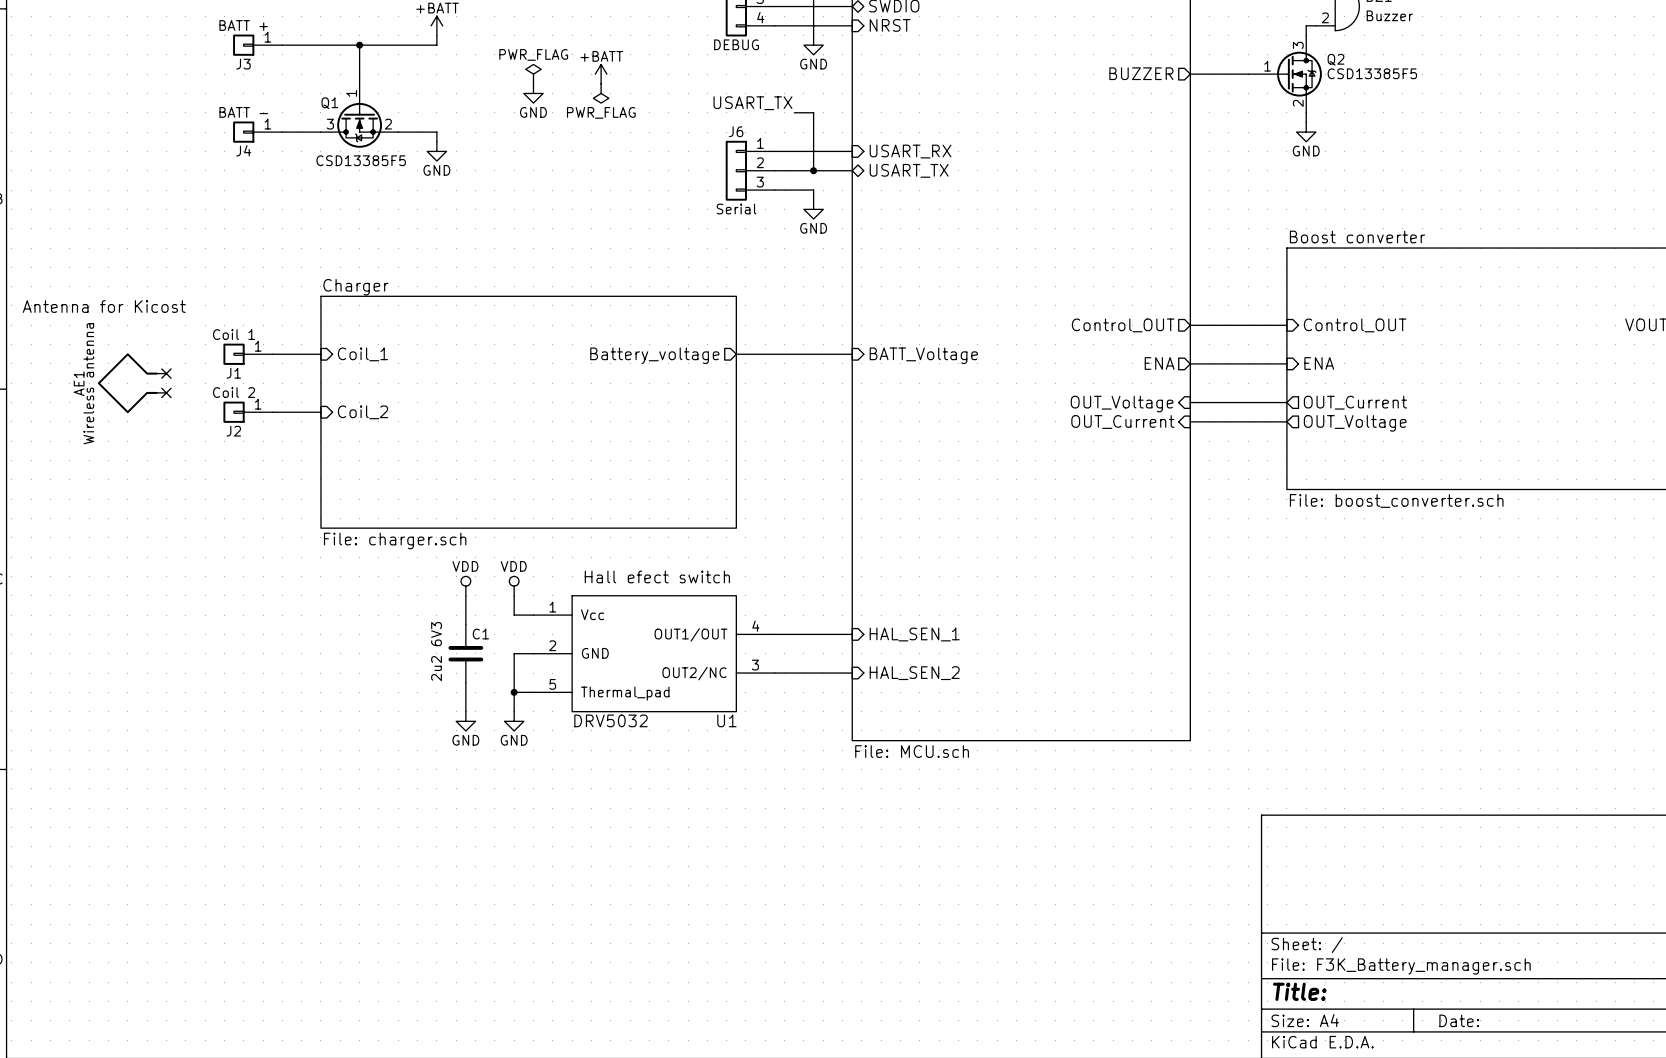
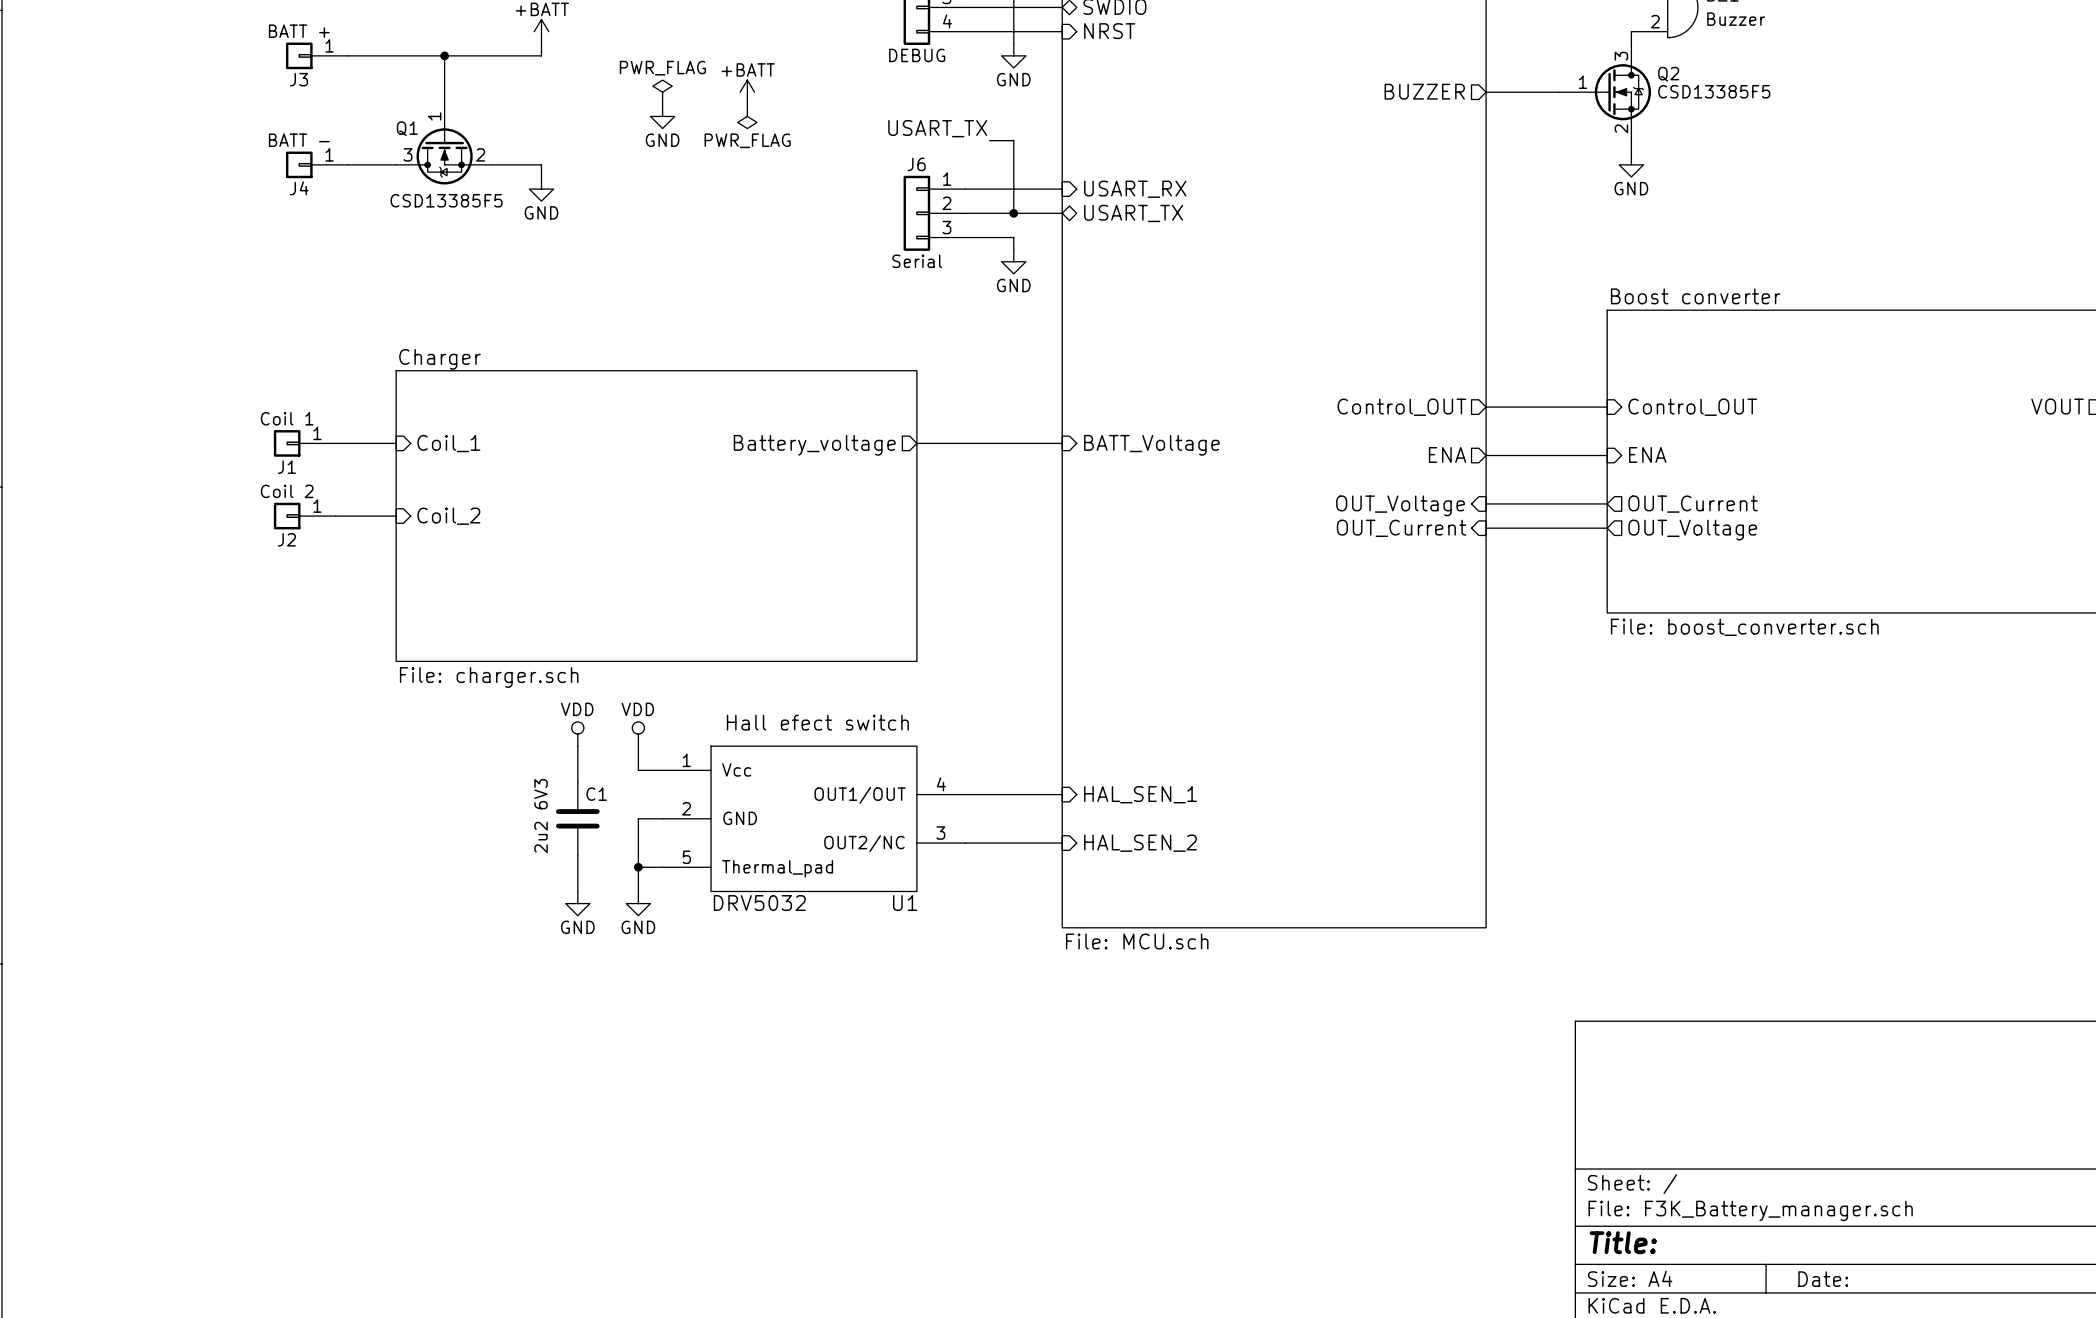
text: Antenna for Kicost (104, 306) -> none
no-connect mark: (166, 373) -> none
AE1: Wireless antenna (132, 383) -> none
no-connect mark: (166, 392) -> none

